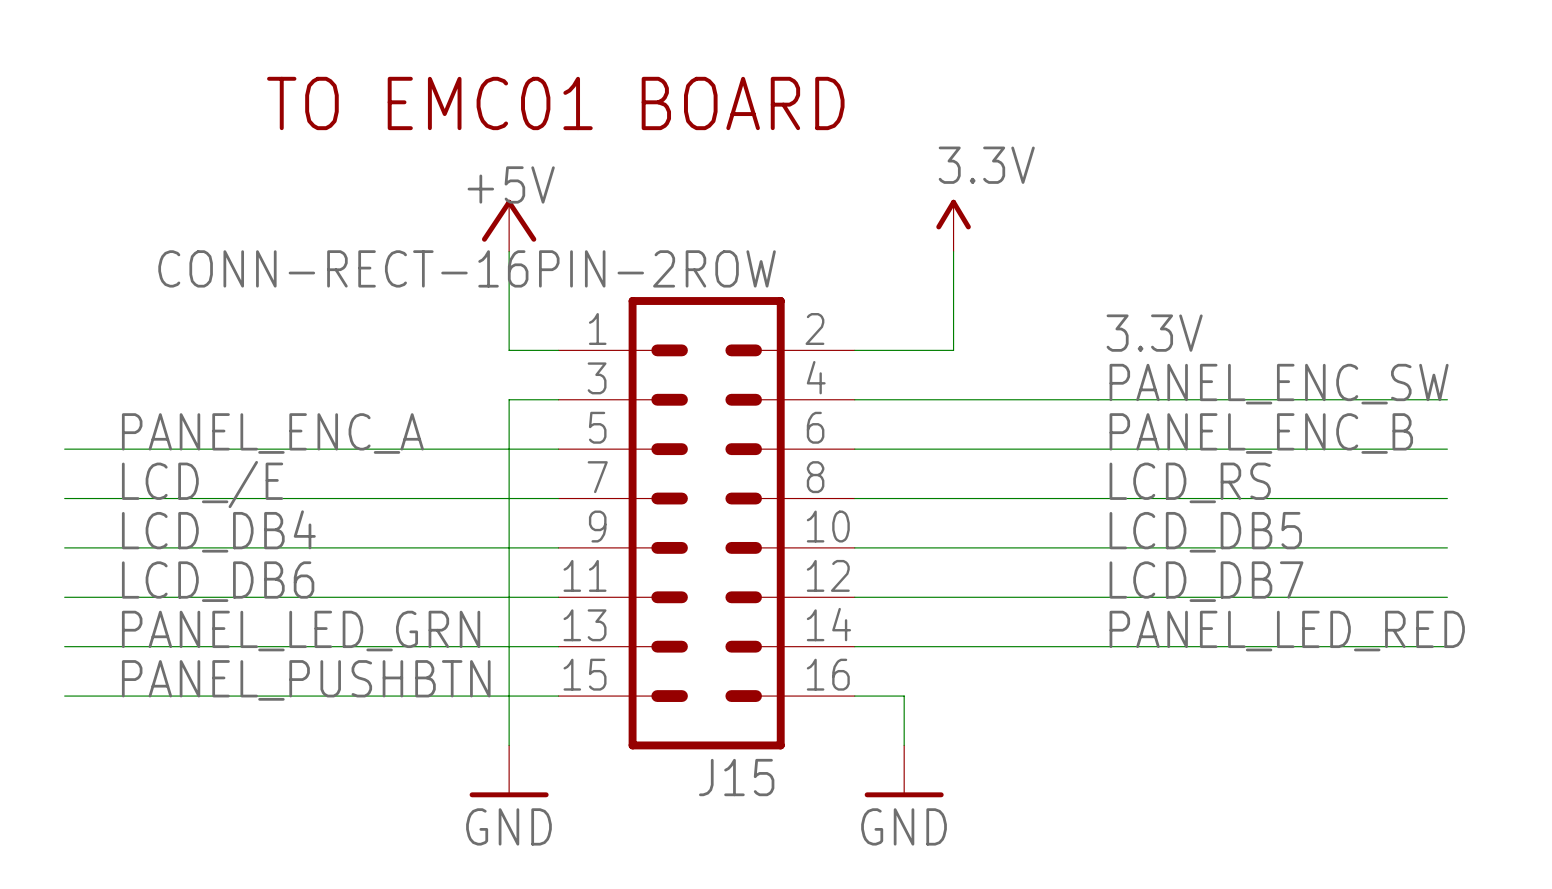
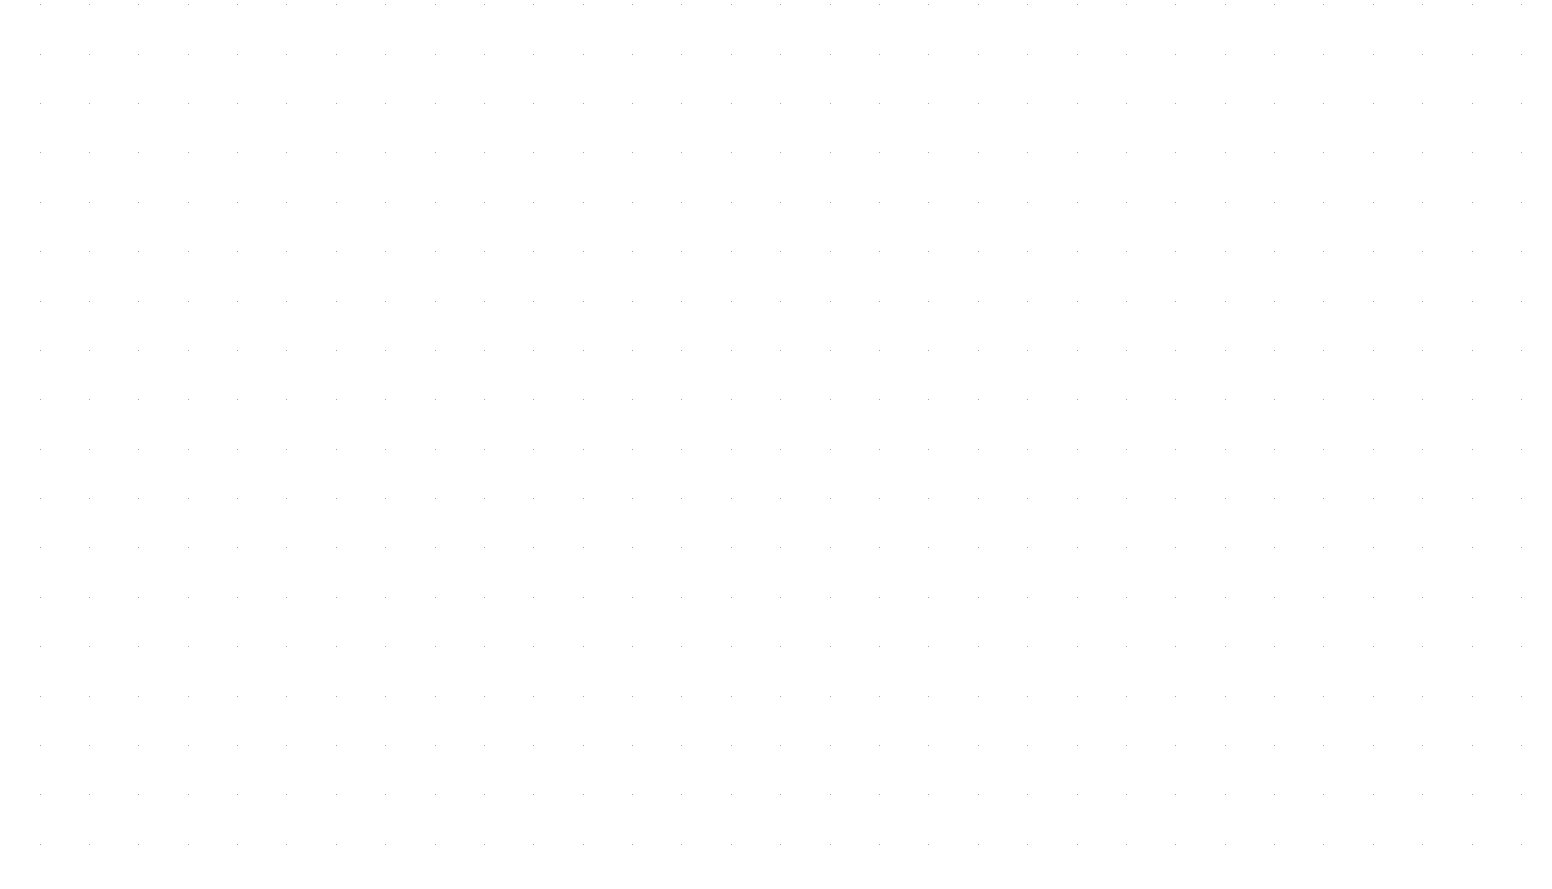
text: TO EMC01 BOARD (555, 103) -> none
power symbol: +5V (509, 225) -> none
power symbol: 3.3V (953, 225) -> none
wire: (509, 251) (509, 350) (558, 350) -> none
wire: (953, 251) (953, 350) (854, 350) -> none
label: 3.3V (1154, 333) -> none
label: PANEL_ENC_SW (1279, 384) -> none
wire: (558, 399) (509, 399) (509, 745) -> none
wire: (854, 399) (1447, 399) -> none
label: PANEL_ENC_A (272, 433) -> none
label: PANEL_ENC_B (1261, 433) -> none
wire: (64, 449) (558, 449) -> none
wire: (854, 449) (1447, 449) -> none
label: LCD_RS (1190, 482) -> none
label: LCD_/E (202, 484) -> none
wire: (64, 498) (558, 498) -> none
wire: (854, 498) (1447, 498) -> none
J15: CONN-RECT-16PIN-2ROW (706, 523) -> none
label: LCD_DB4 (218, 531) -> none
label: LCD_DB5 (1205, 532) -> none
wire: (64, 547) (558, 547) -> none
wire: (854, 547) (1447, 547) -> none
label: LCD_DB6 (218, 581) -> none
label: LCD_DB7 (1206, 581) -> none
wire: (64, 597) (558, 597) -> none
wire: (854, 597) (1447, 597) -> none
label: PANEL_LED_GRN (301, 631) -> none
label: PANEL_LED_RED (1287, 631) -> none
wire: (64, 646) (558, 646) -> none
wire: (854, 646) (1447, 646) -> none
label: PANEL_PUSHBTN (306, 680) -> none
wire: (64, 696) (558, 696) -> none
wire: (854, 696) (904, 696) (904, 745) -> none
power symbol: GND (509, 771) -> none
power symbol: GND (904, 771) -> none

